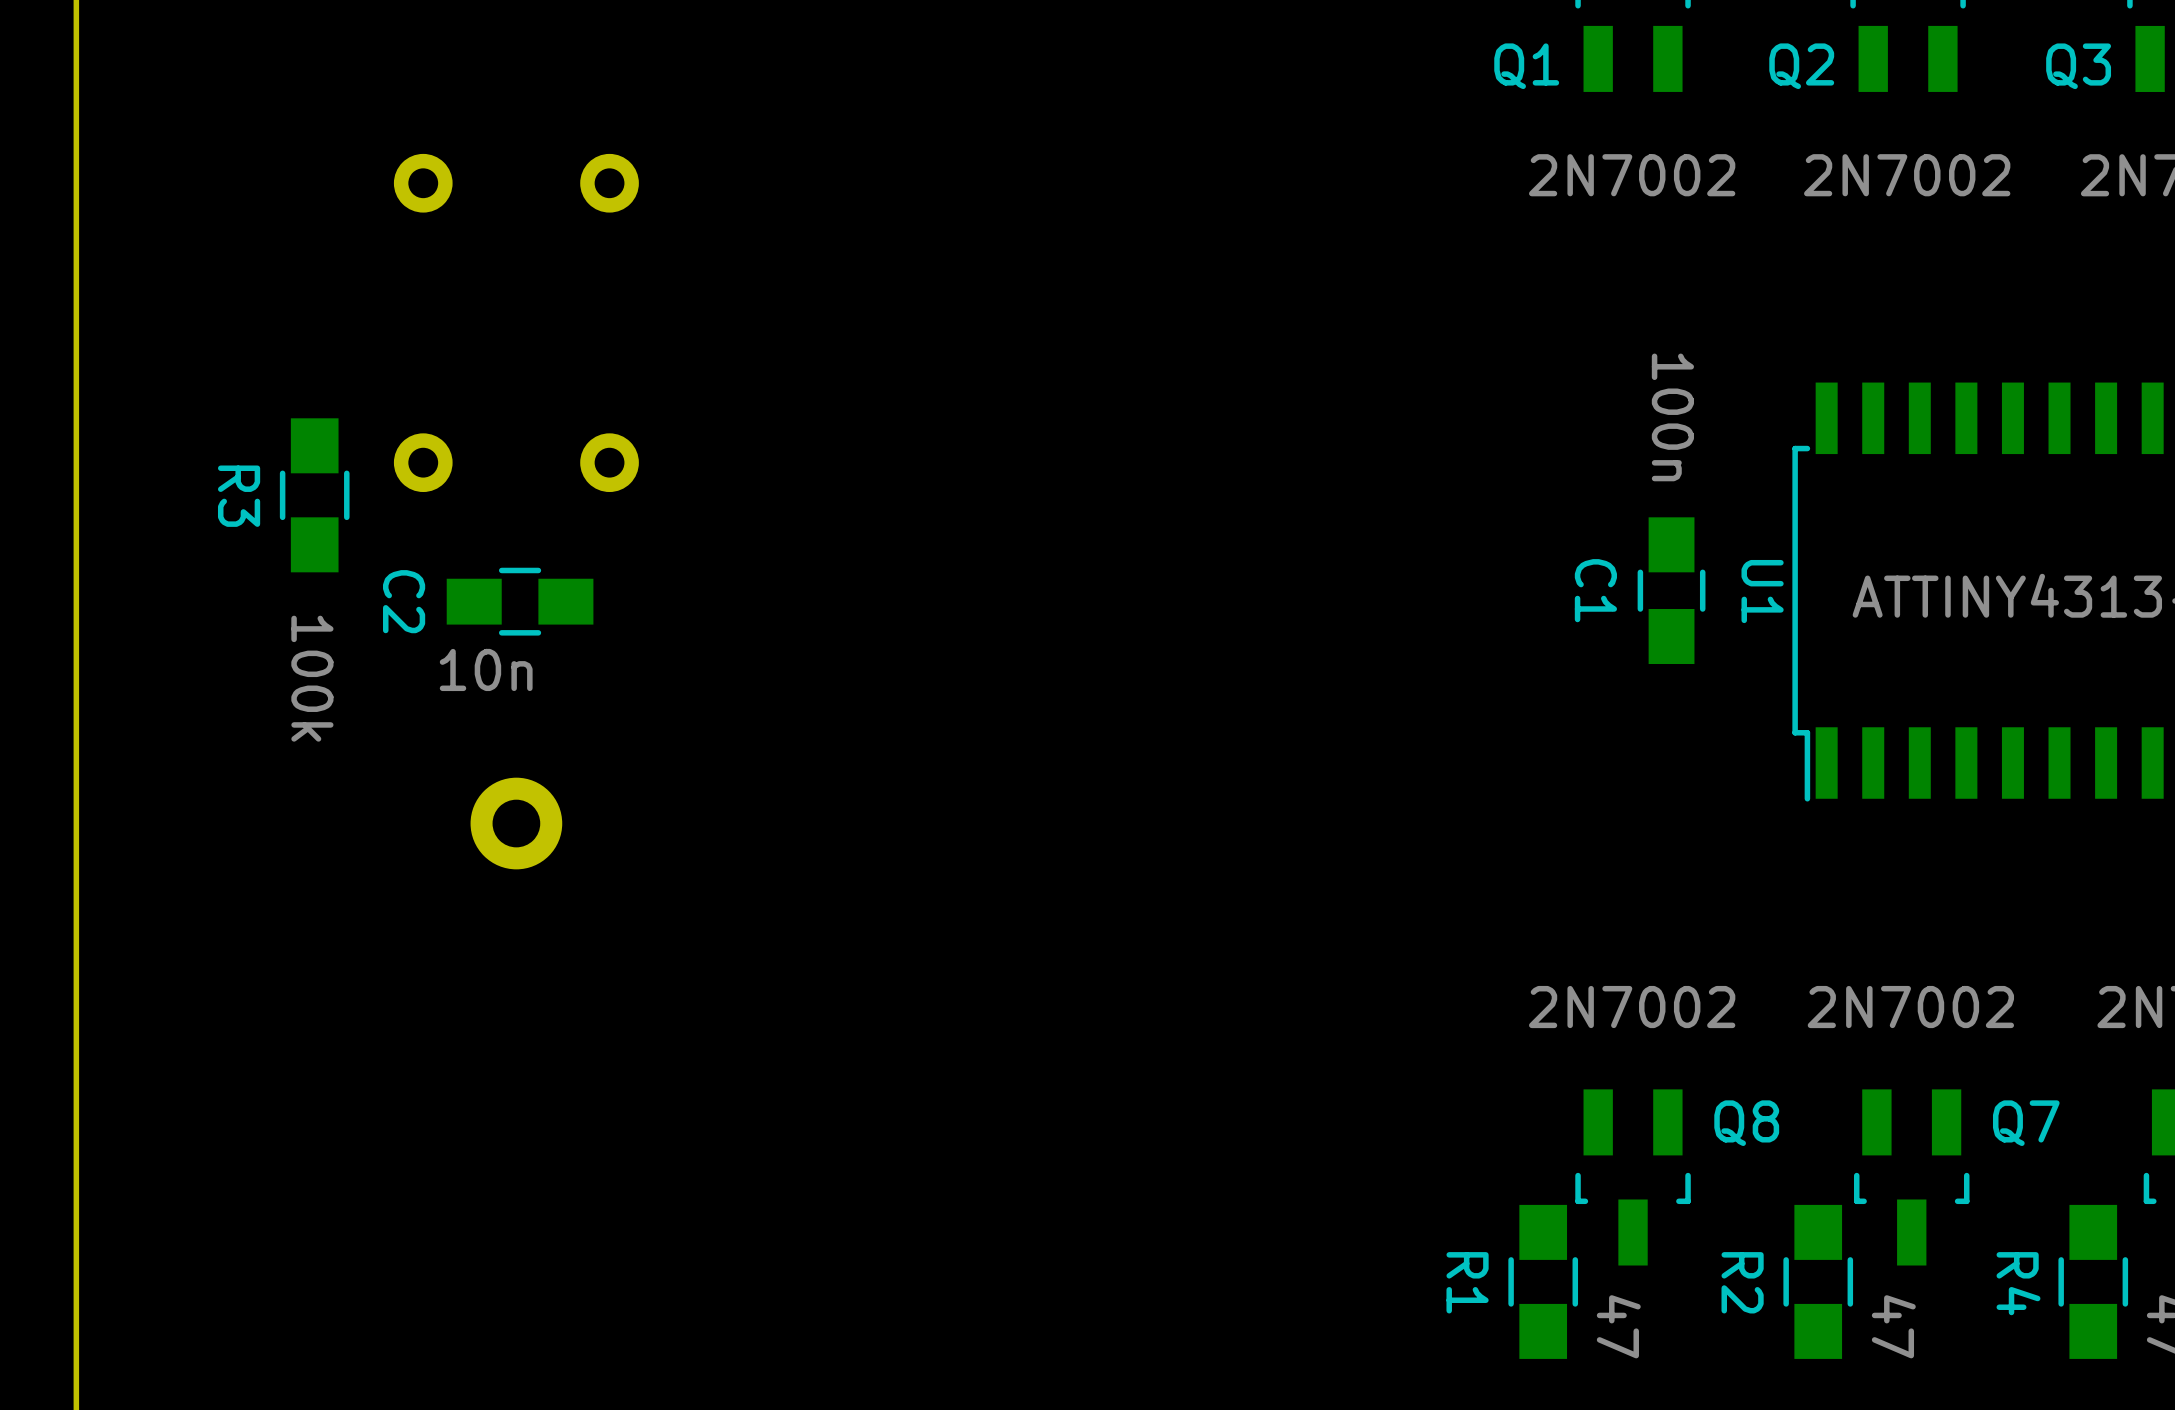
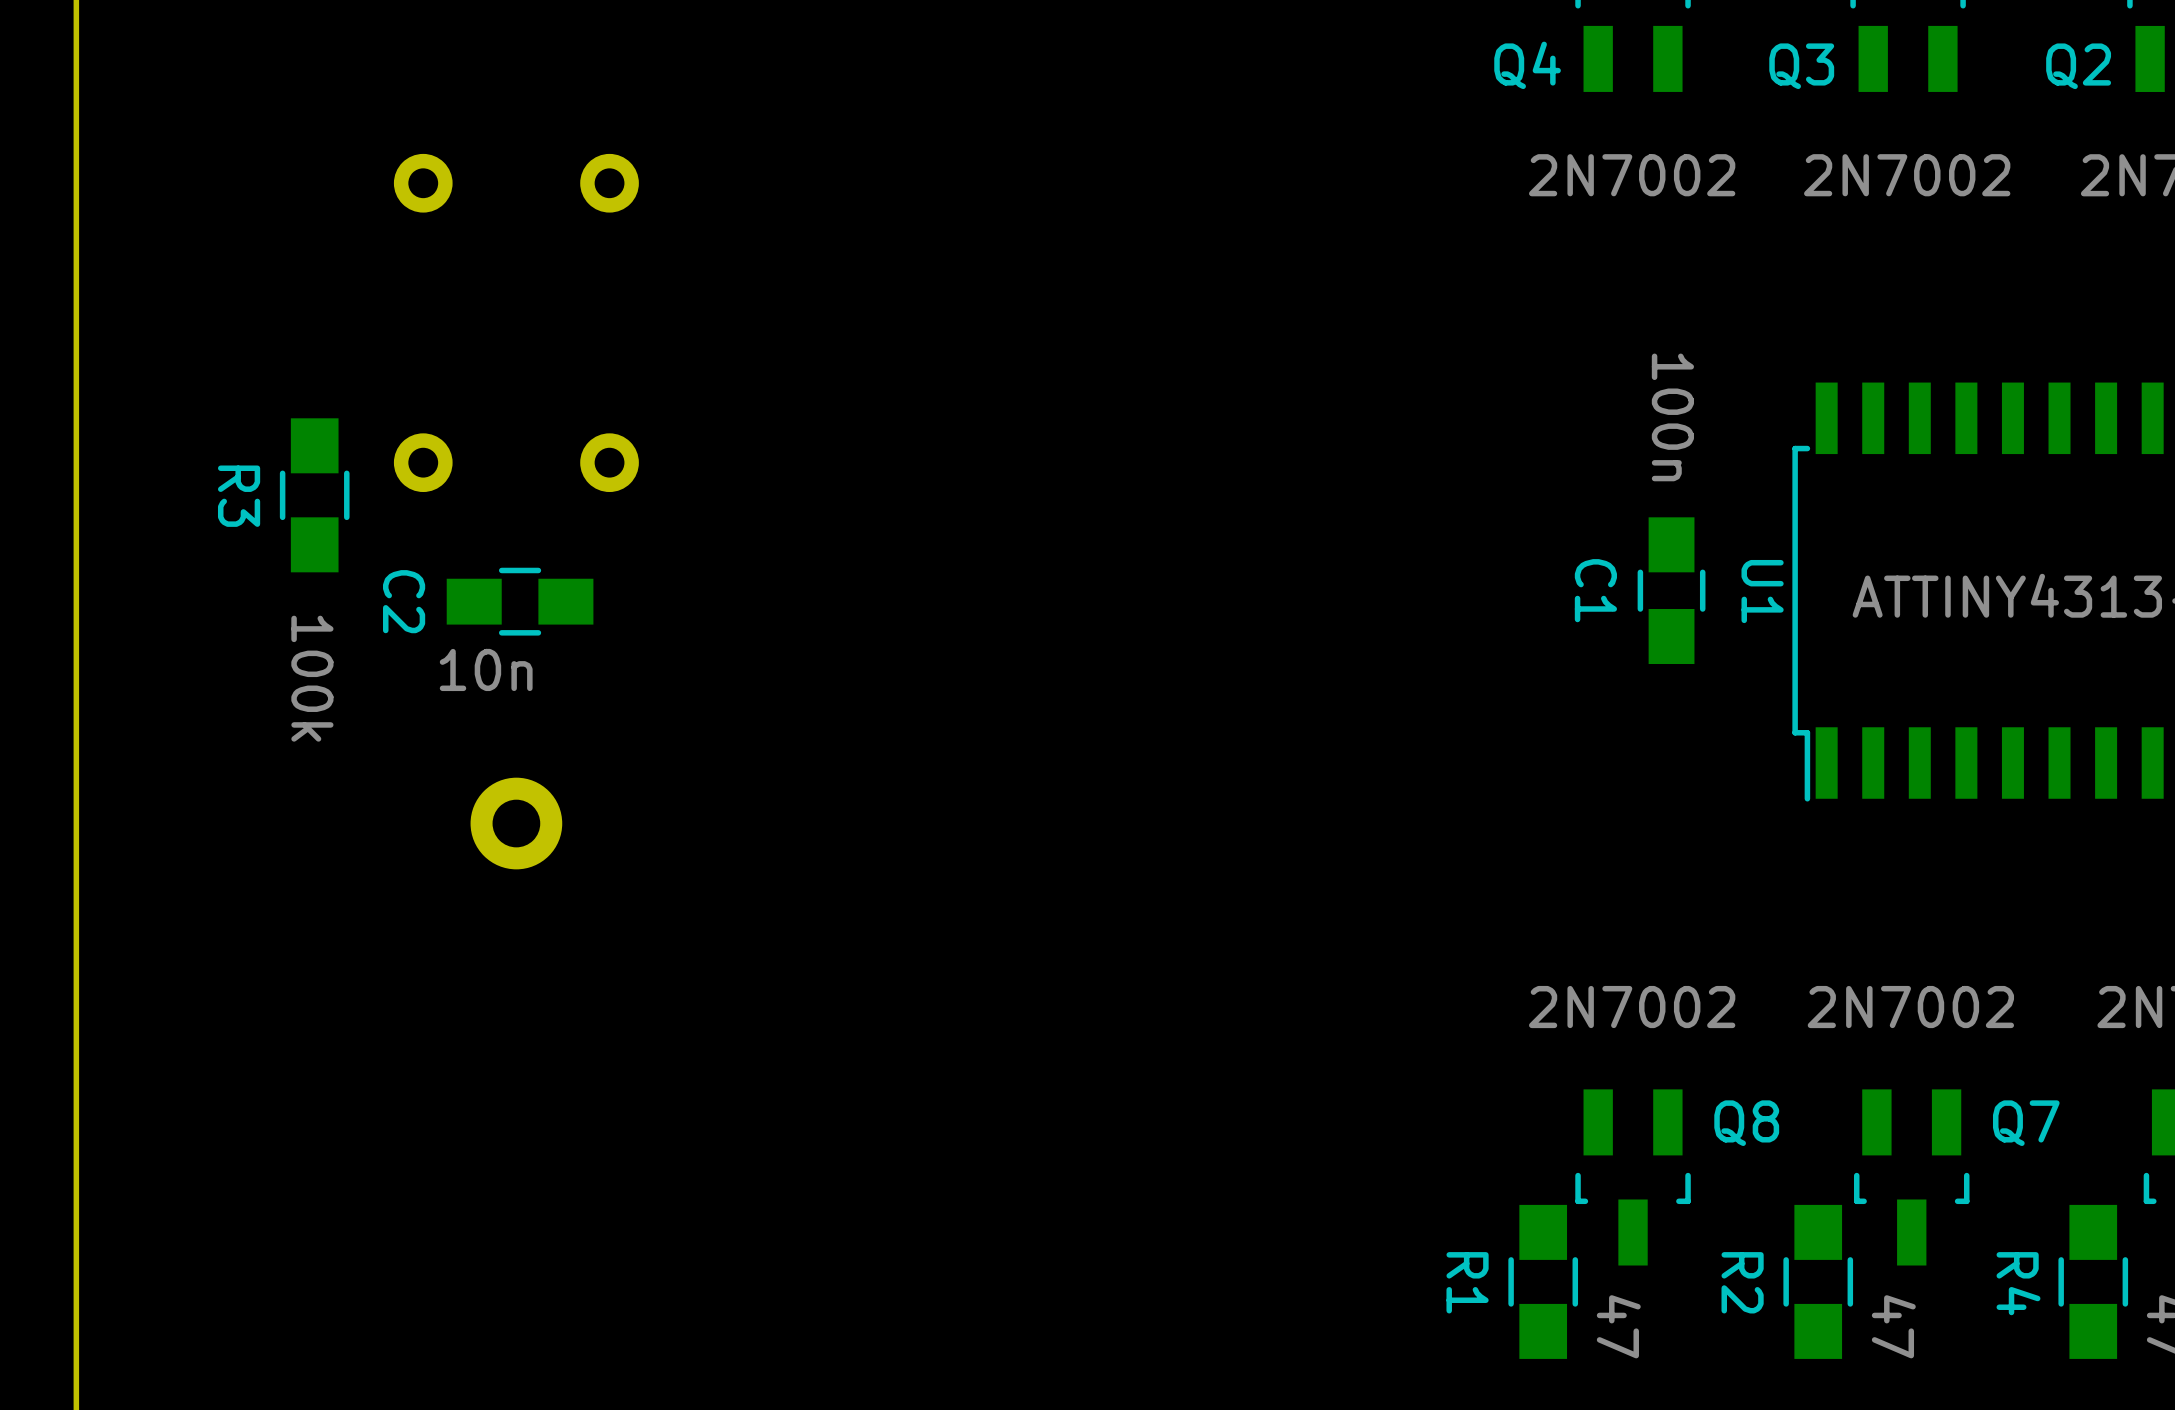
Q1 name: Q1 (1526, 66) -> Q4 (1527, 65)
Q2 name: Q2 (1801, 66) -> Q3 (1801, 66)
Q3 name: Q3 (2078, 66) -> Q2 (2078, 66)

